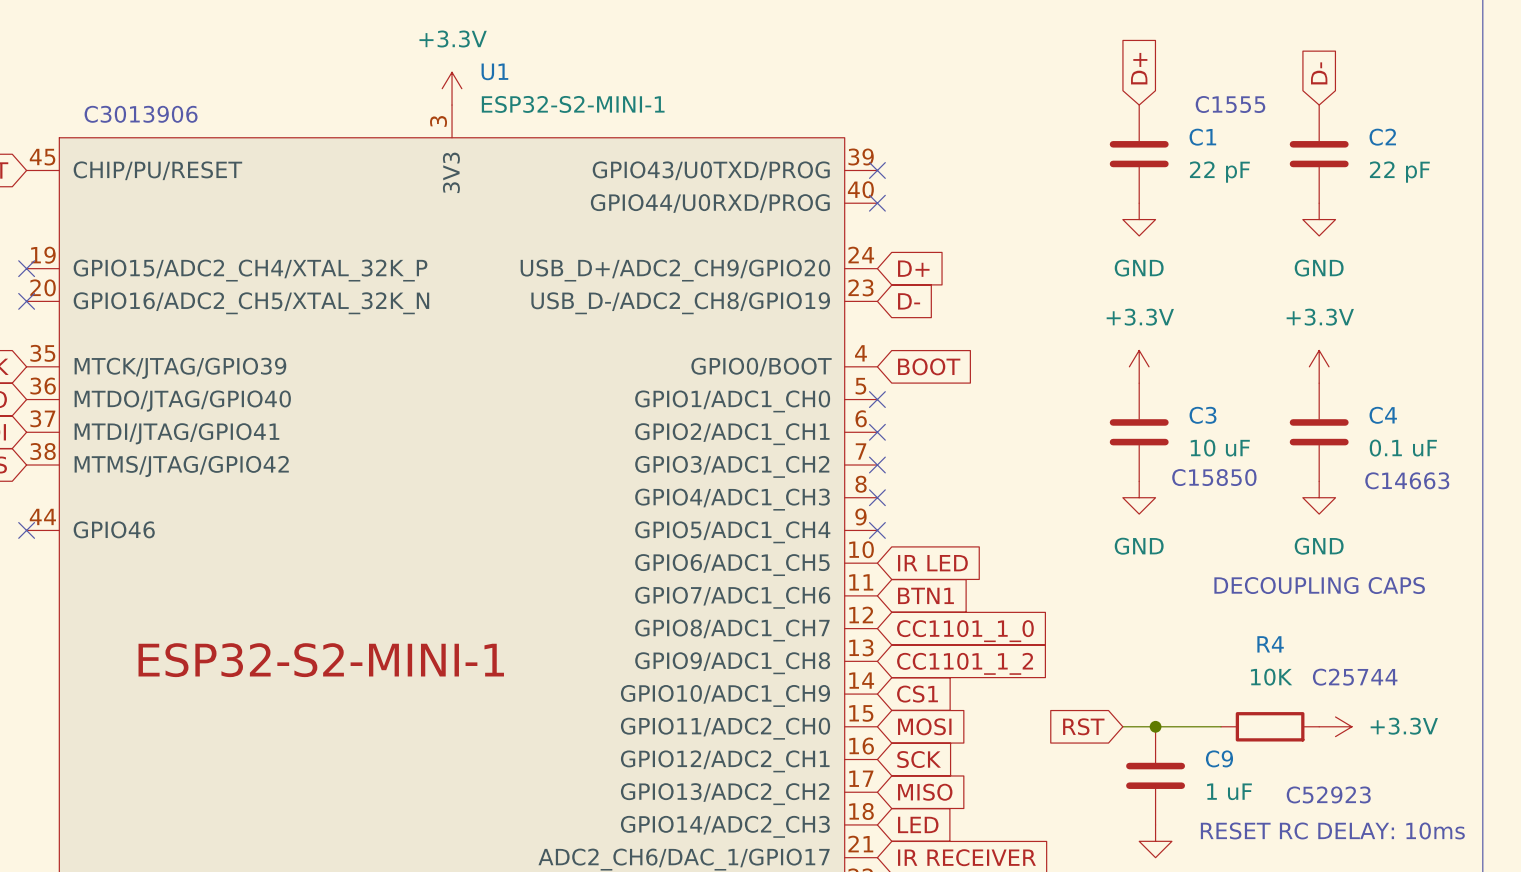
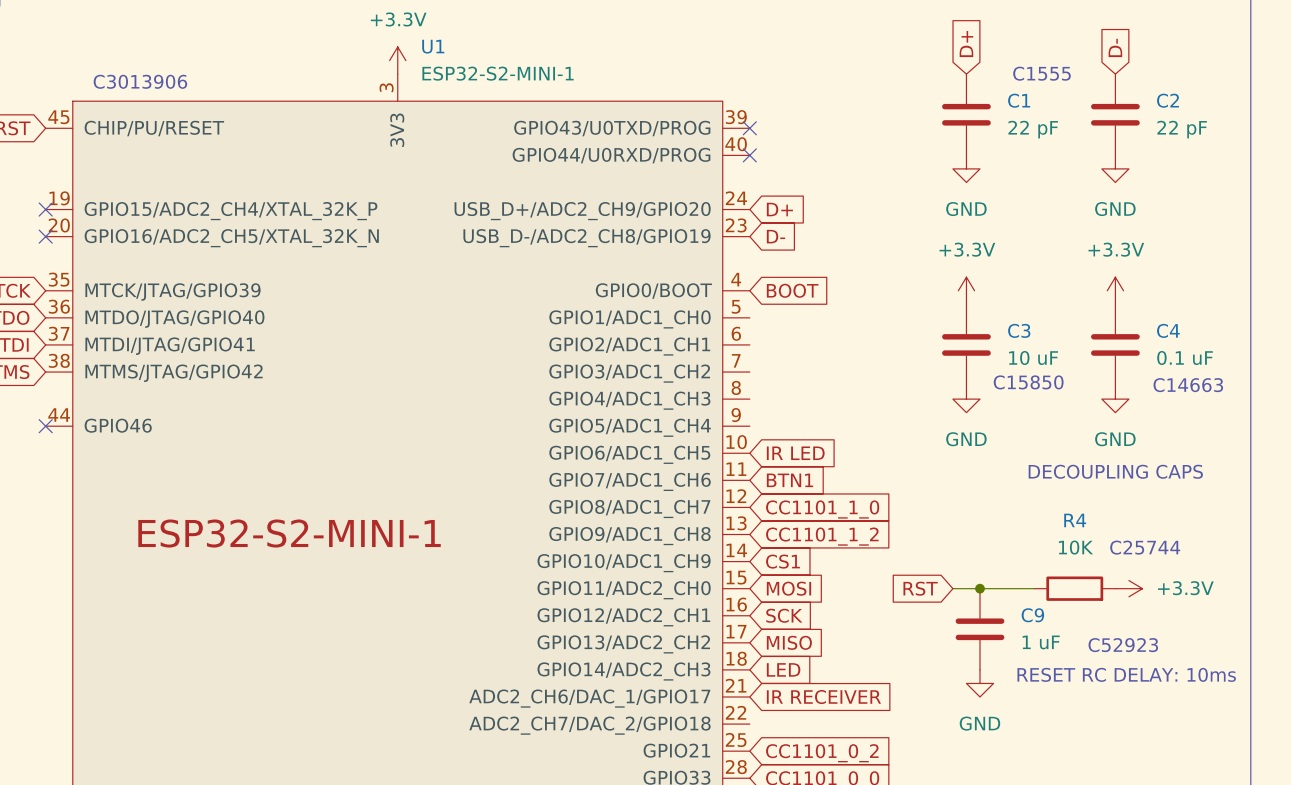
no-connect mark: (877, 399) -> none
no-connect mark: (877, 432) -> none
no-connect mark: (877, 465) -> none
no-connect mark: (877, 497) -> none
no-connect mark: (877, 530) -> none

